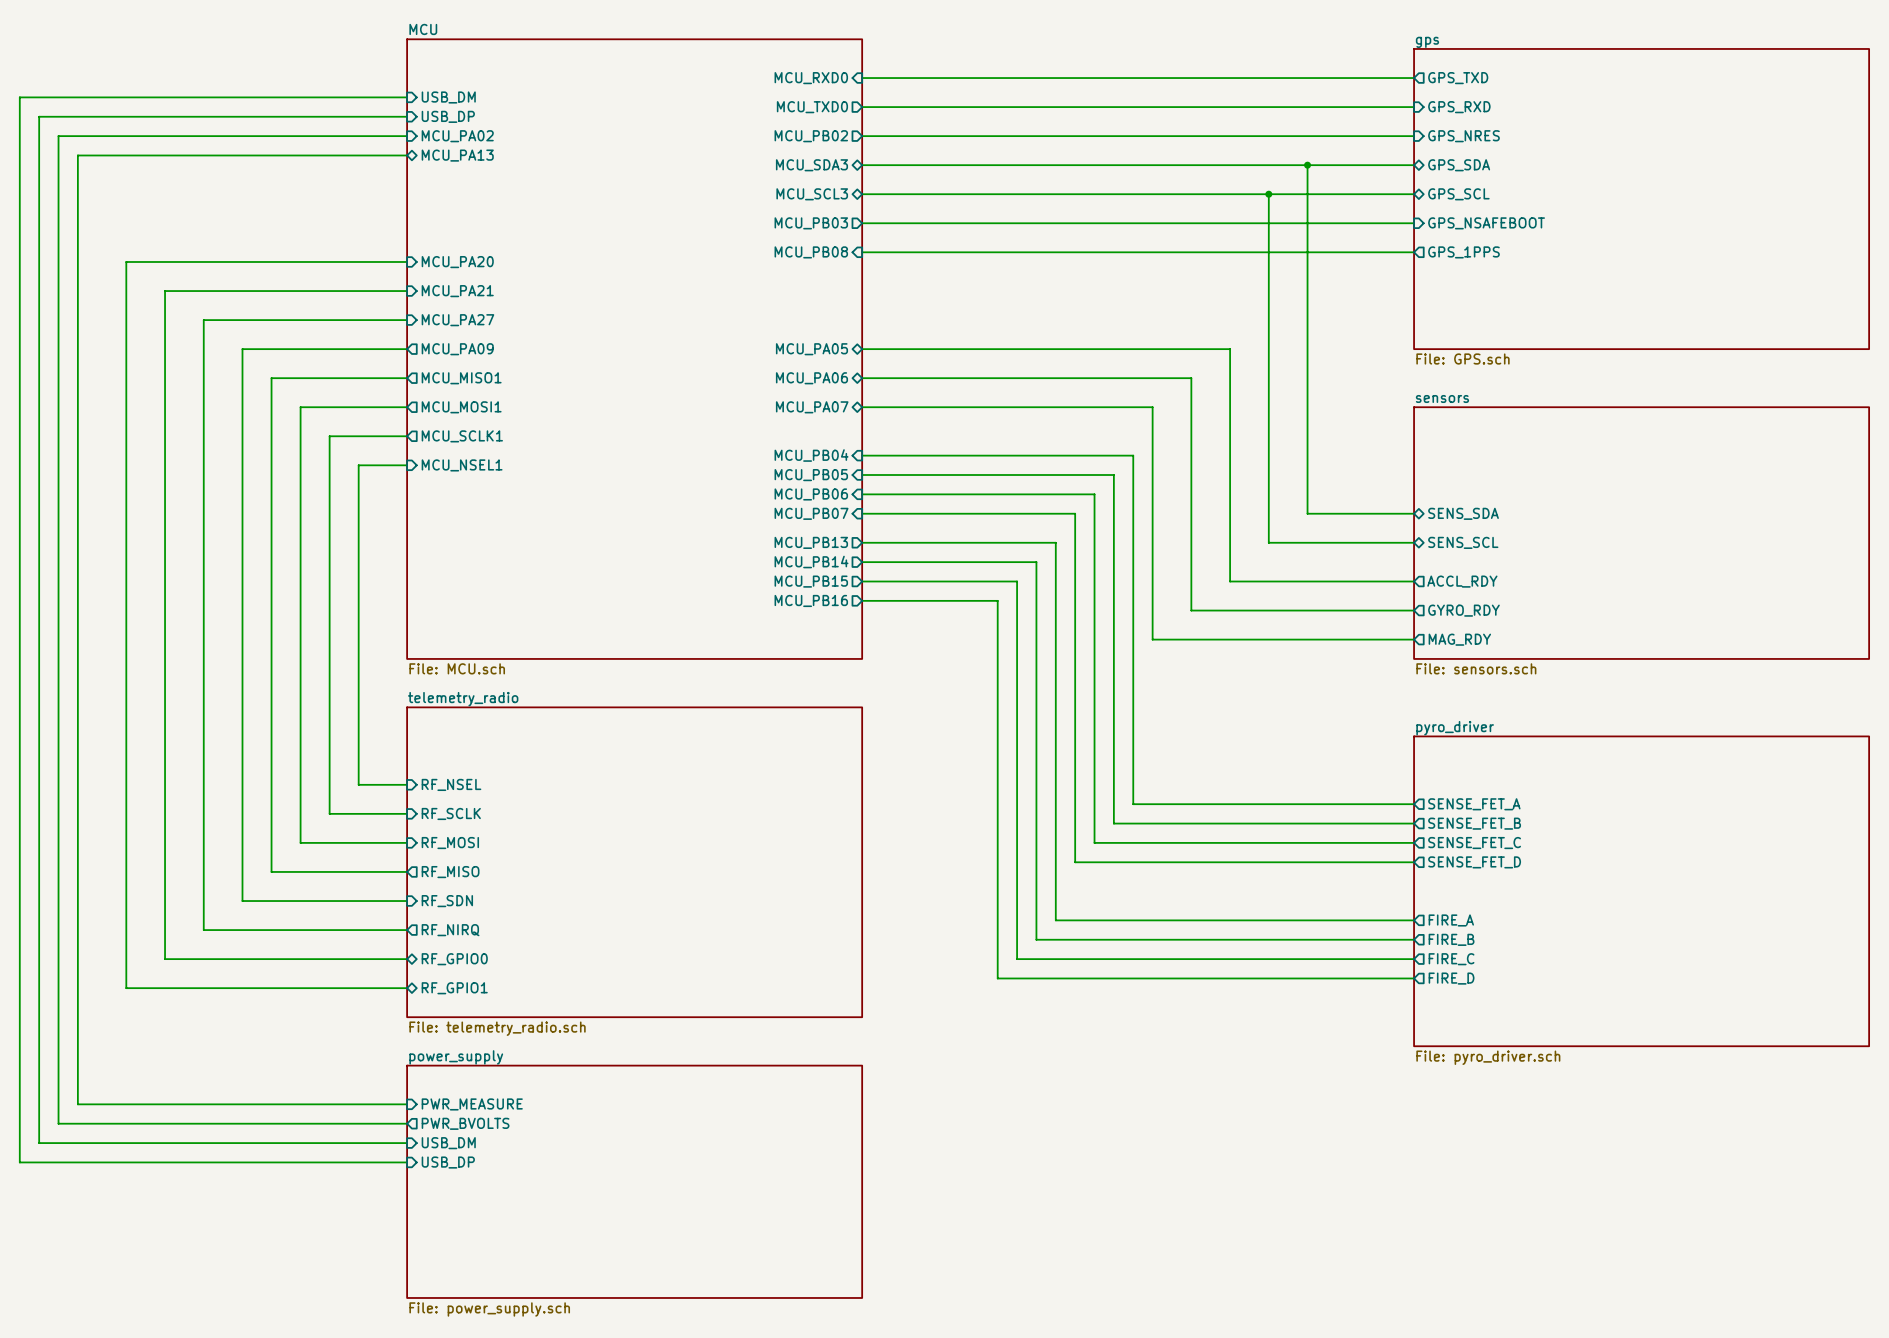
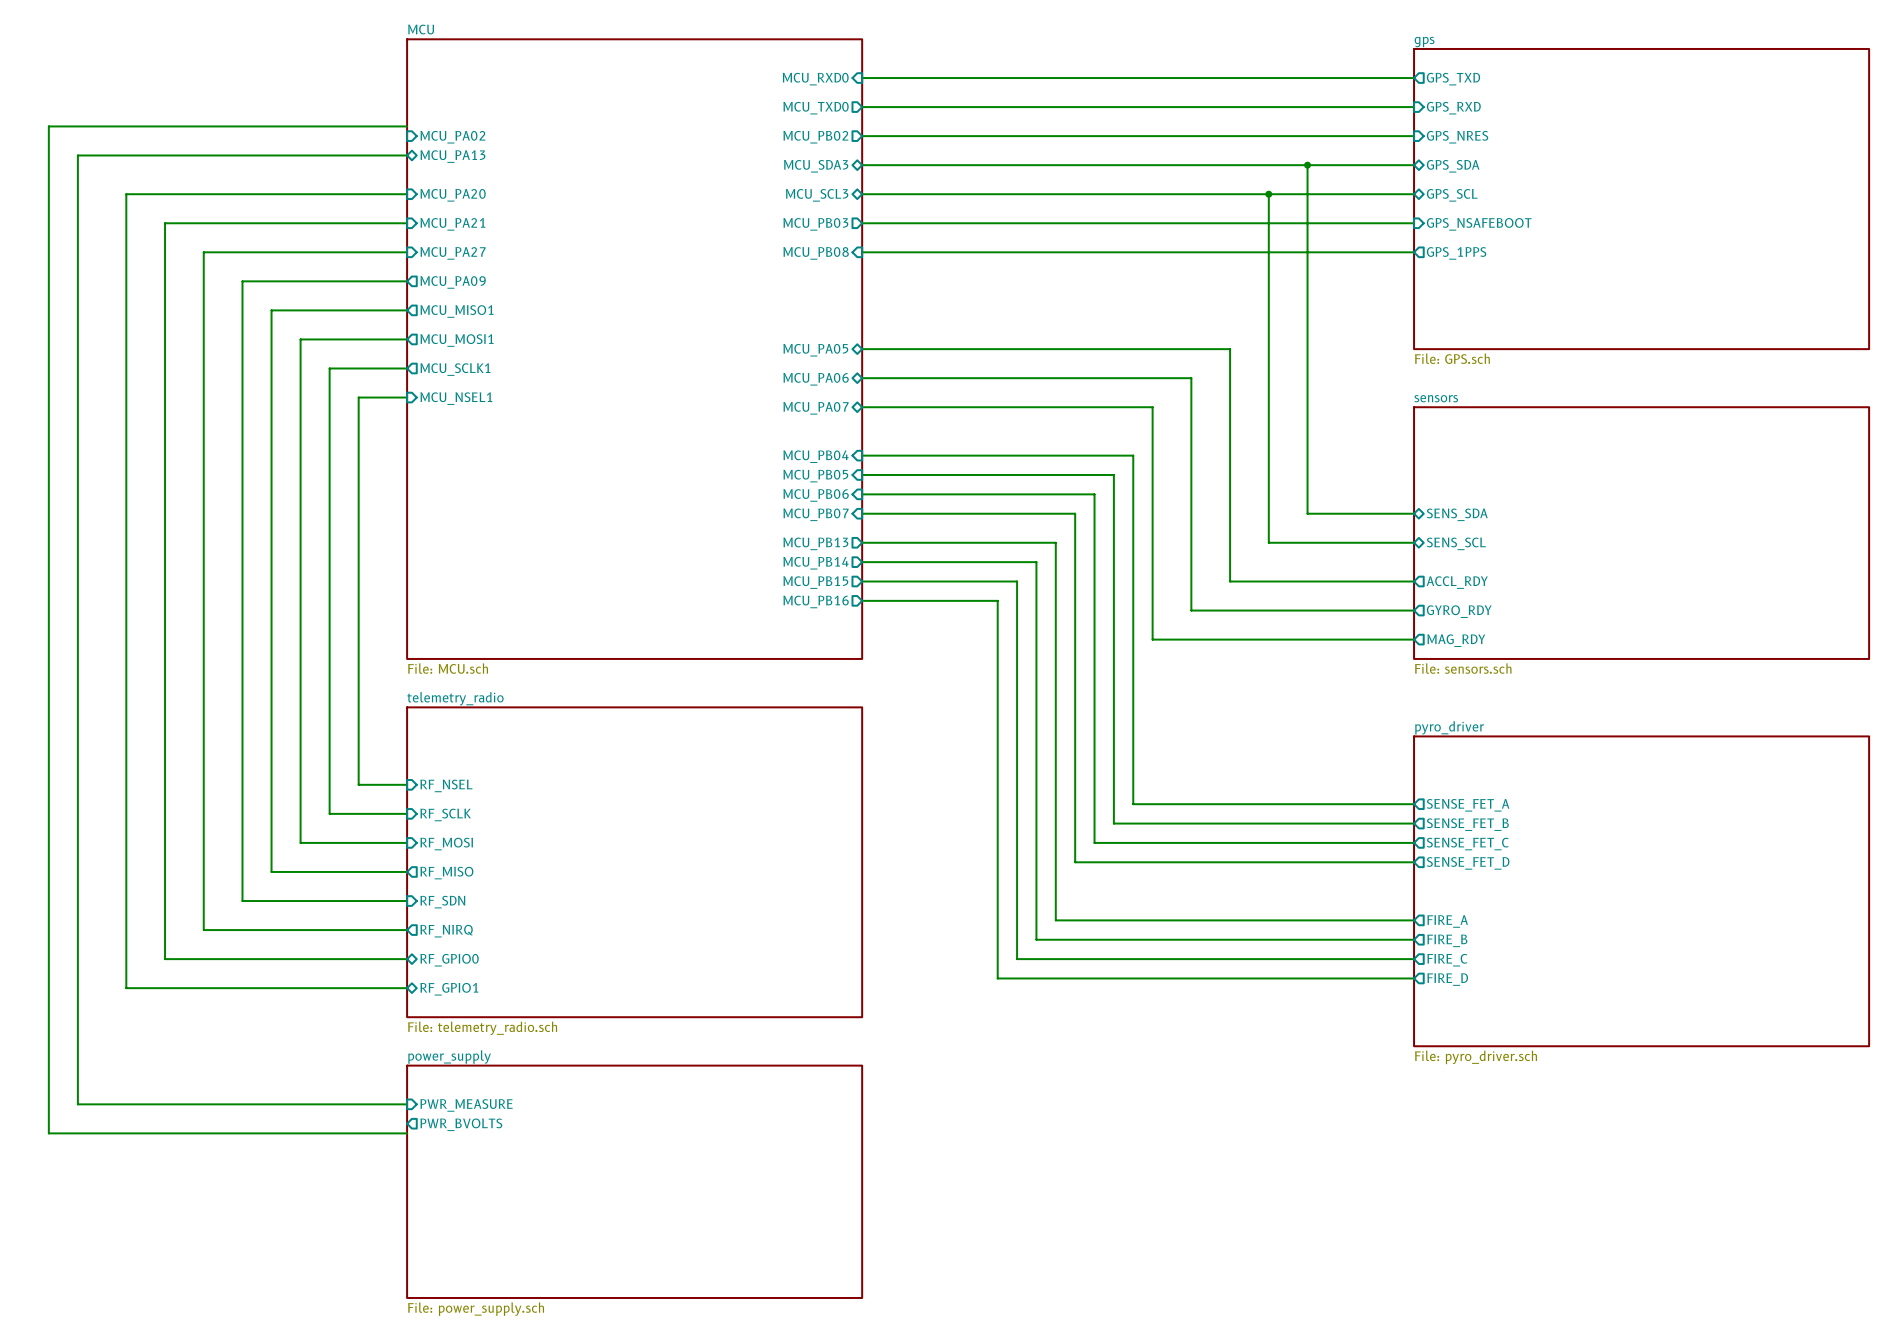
wire: (407, 97) (19, 97) (19, 1162) (407, 1162) -> none
sheet pin: USB_DM (448, 97) -> none
wire: (407, 116) (39, 116) (39, 1143) (407, 1143) -> none
sheet pin: USB_DP (448, 116) -> none
wire: none -> (407, 126) (48, 126) (48, 1133) (407, 1133)
wire: (407, 136) (58, 136) (58, 1123) (407, 1123) -> none
wire: (126, 261) (407, 261) -> (126, 261) (126, 194) (407, 194)
sheet pin position: MCU_PA20 (457, 262) -> MCU_PA20 (453, 195)
wire: (165, 291) (407, 291) -> (165, 291) (165, 223) (407, 223)
sheet pin position: MCU_PA21 (457, 291) -> MCU_PA21 (452, 224)
wire: (203, 320) (407, 320) -> (203, 320) (203, 252) (407, 252)
sheet pin position: MCU_PA27 (457, 320) -> MCU_PA27 (453, 253)
wire: (242, 349) (407, 349) -> (242, 349) (242, 281) (407, 281)
sheet pin position: MCU_PA09 (457, 349) -> MCU_PA09 (453, 282)
wire: (271, 378) (407, 378) -> (271, 378) (271, 310) (407, 310)
sheet pin position: MCU_MISO1 (461, 378) -> MCU_MISO1 (457, 311)
wire: (300, 407) (407, 407) -> (300, 407) (300, 339) (407, 339)
sheet pin position: MCU_MOSI1 (461, 407) -> MCU_MOSI1 (457, 340)
wire: (329, 436) (407, 436) -> (329, 436) (329, 368) (407, 368)
sheet pin position: MCU_SCLK1 (462, 436) -> MCU_SCLK1 (455, 369)
wire: (358, 465) (407, 465) -> (358, 465) (358, 397) (407, 397)
sheet pin position: MCU_NSEL1 (462, 465) -> MCU_NSEL1 (456, 398)
sheet pin: USB_DM (448, 1143) -> none
sheet pin: USB_DP (448, 1162) -> none

